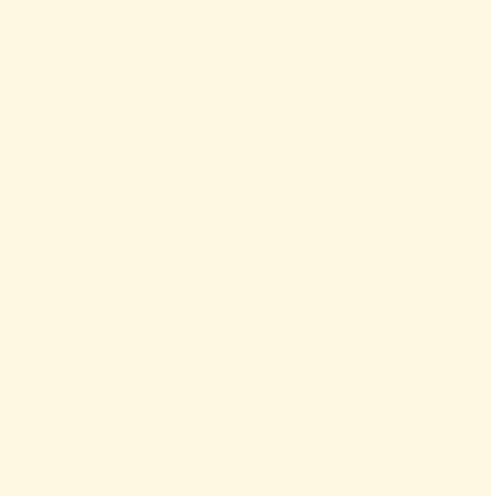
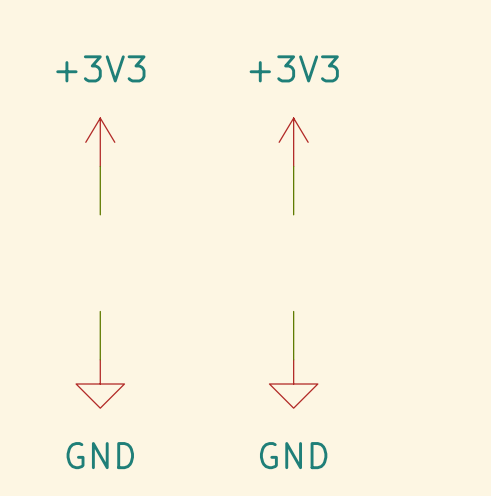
power symbol: none -> +3V3 (100, 142)
power symbol: none -> +3V3 (293, 142)
wire: none -> (100, 166) (100, 214)
wire: none -> (293, 166) (293, 214)
wire: none -> (100, 311) (100, 359)
wire: none -> (293, 311) (293, 359)
power symbol: none -> GND (100, 384)
power symbol: none -> GND (293, 384)

